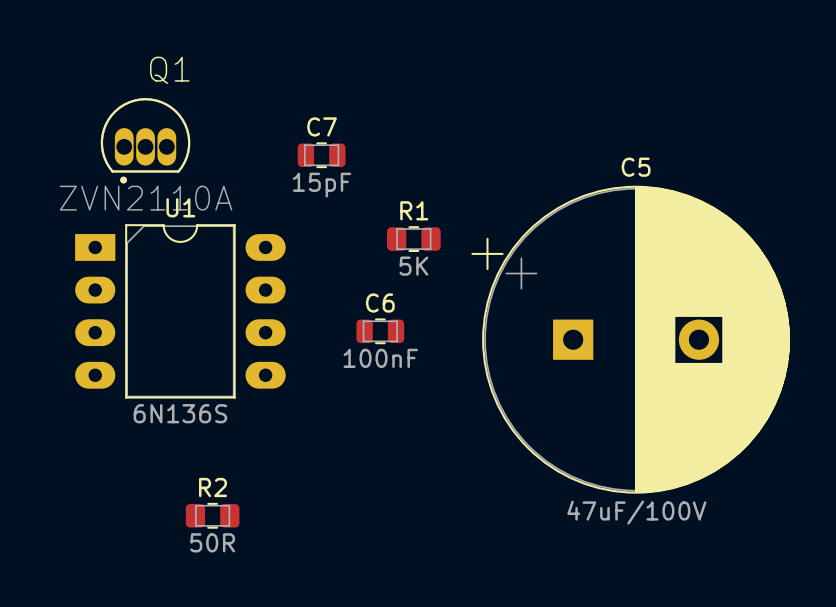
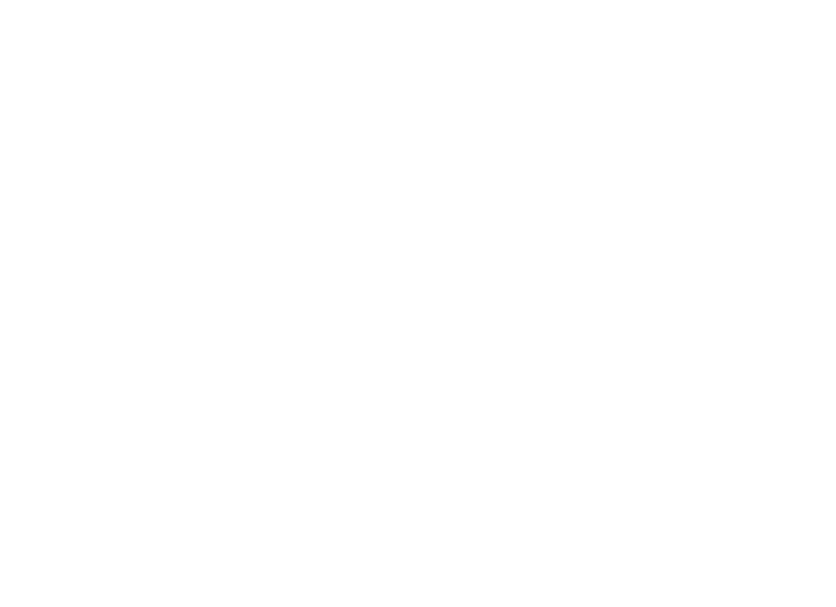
Q1: ZVN2110A (145, 140) -> none
C7: 15pF (321, 155) -> none
R1: 5K (413, 239) -> none
U1: 6N136S (180, 311) -> none
C6: 100nF (380, 331) -> none
C5: 47uF/100V (630, 339) -> none
R2: 50R (212, 515) -> none

